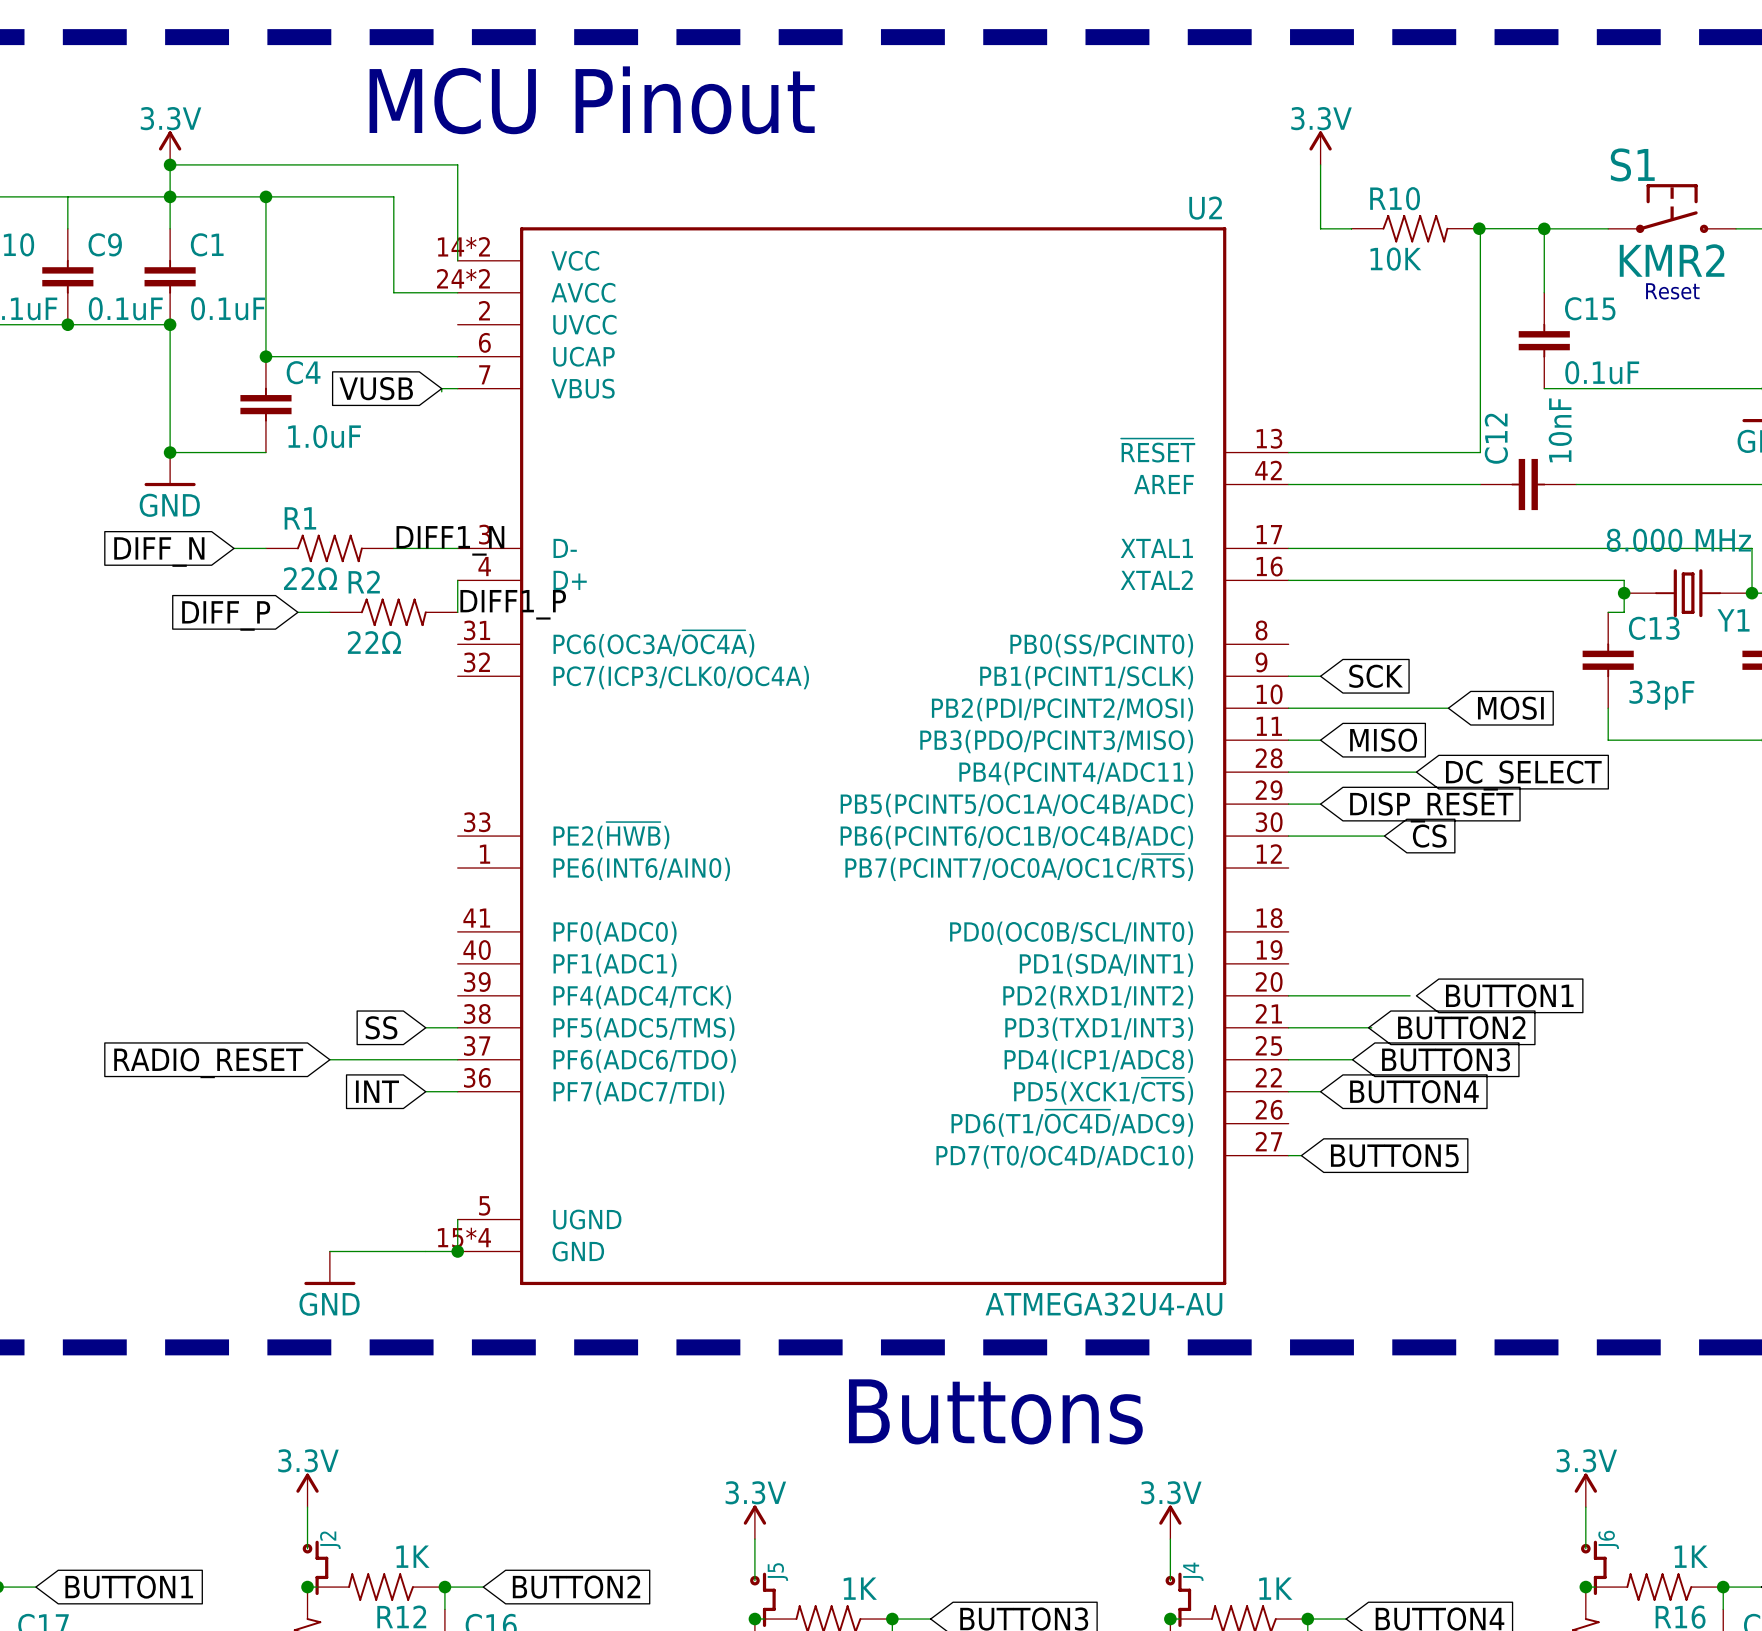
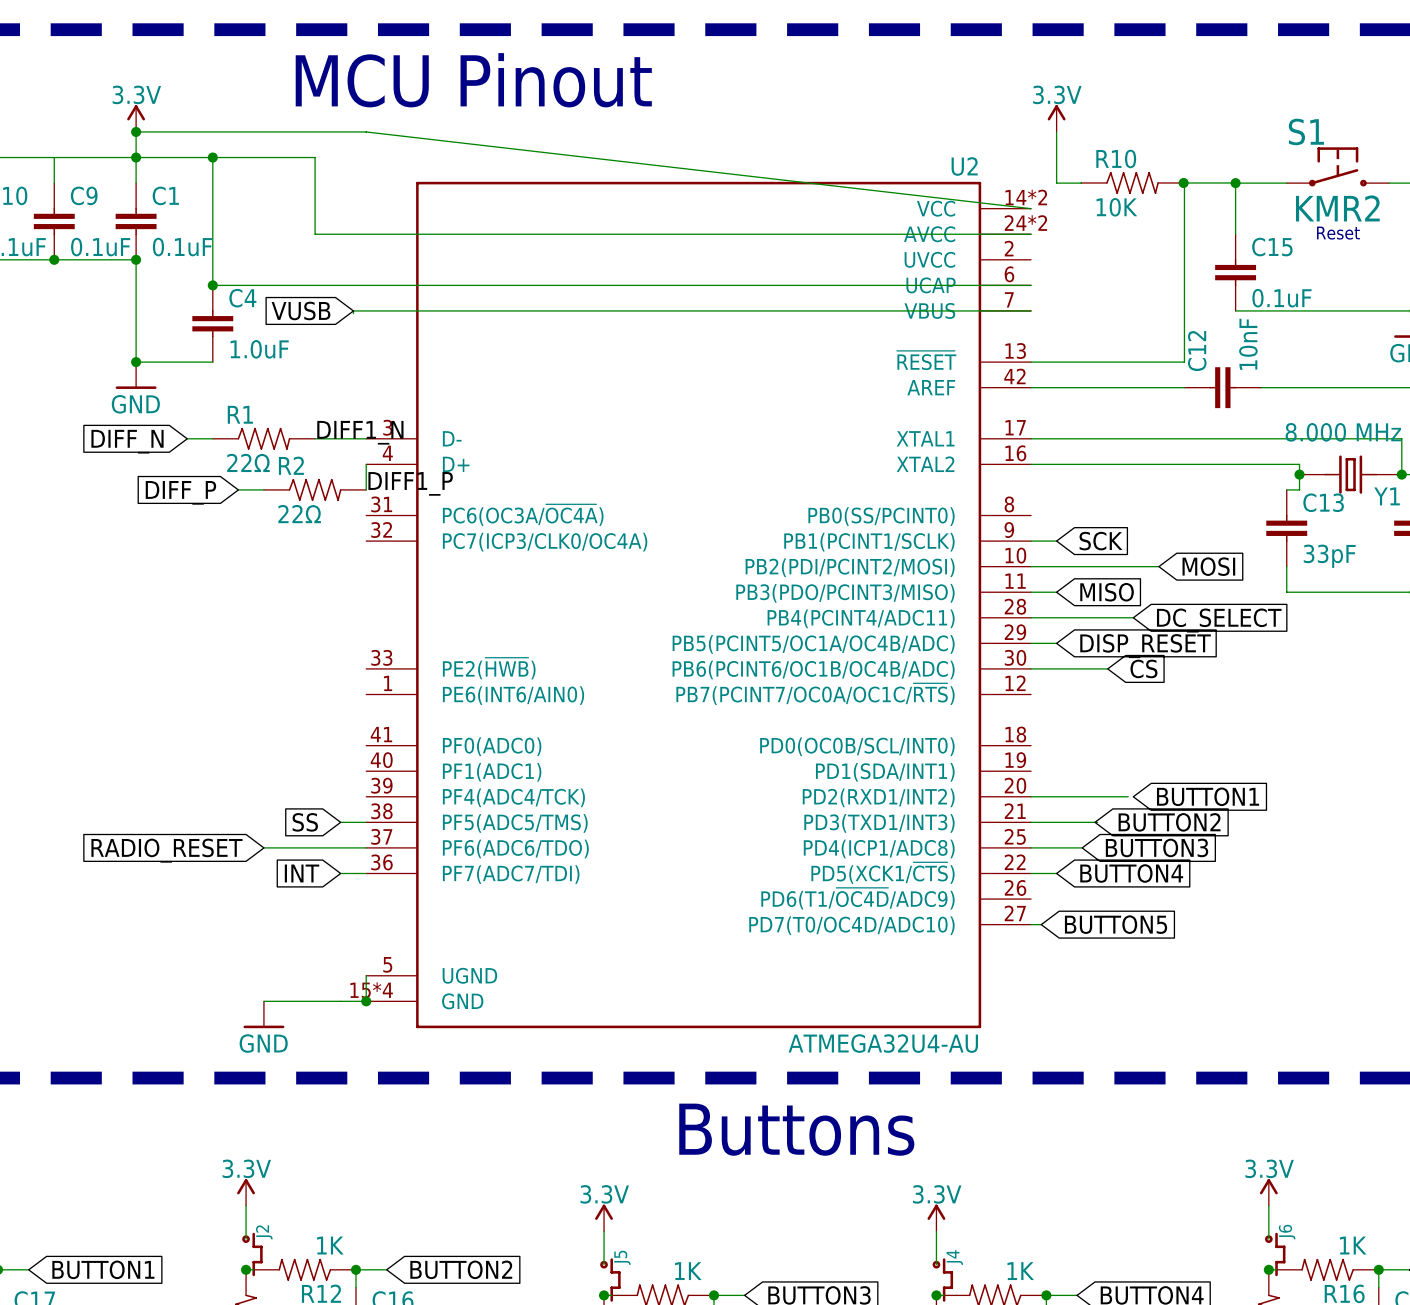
wire: (457, 164) (457, 260) -> (366, 131) (1031, 208)
U2 symbol: [457, 227, 1289, 1286] -> [366, 181, 1032, 1029]
wire: none -> (366, 234) (1031, 234)
wire: none -> (366, 285) (1031, 285)
wire: none -> (366, 310) (1031, 310)

